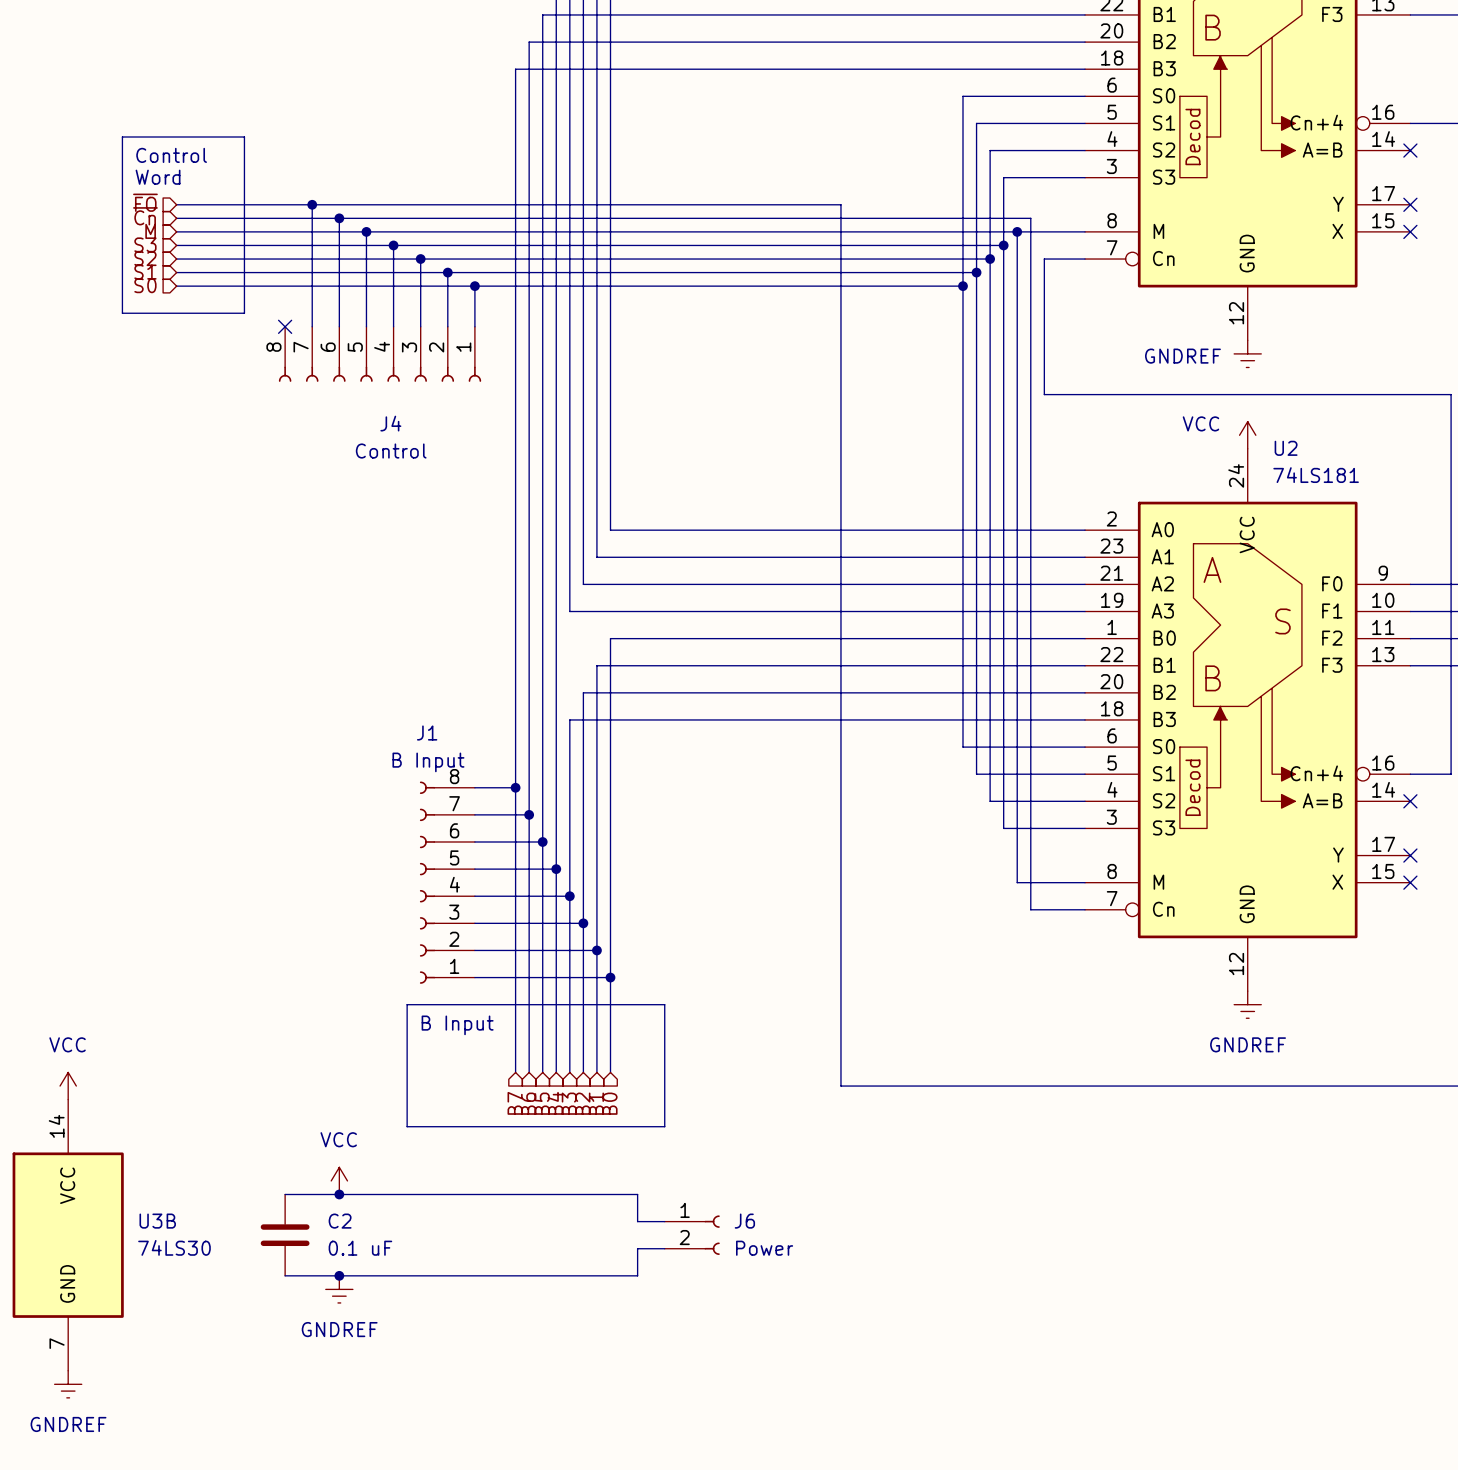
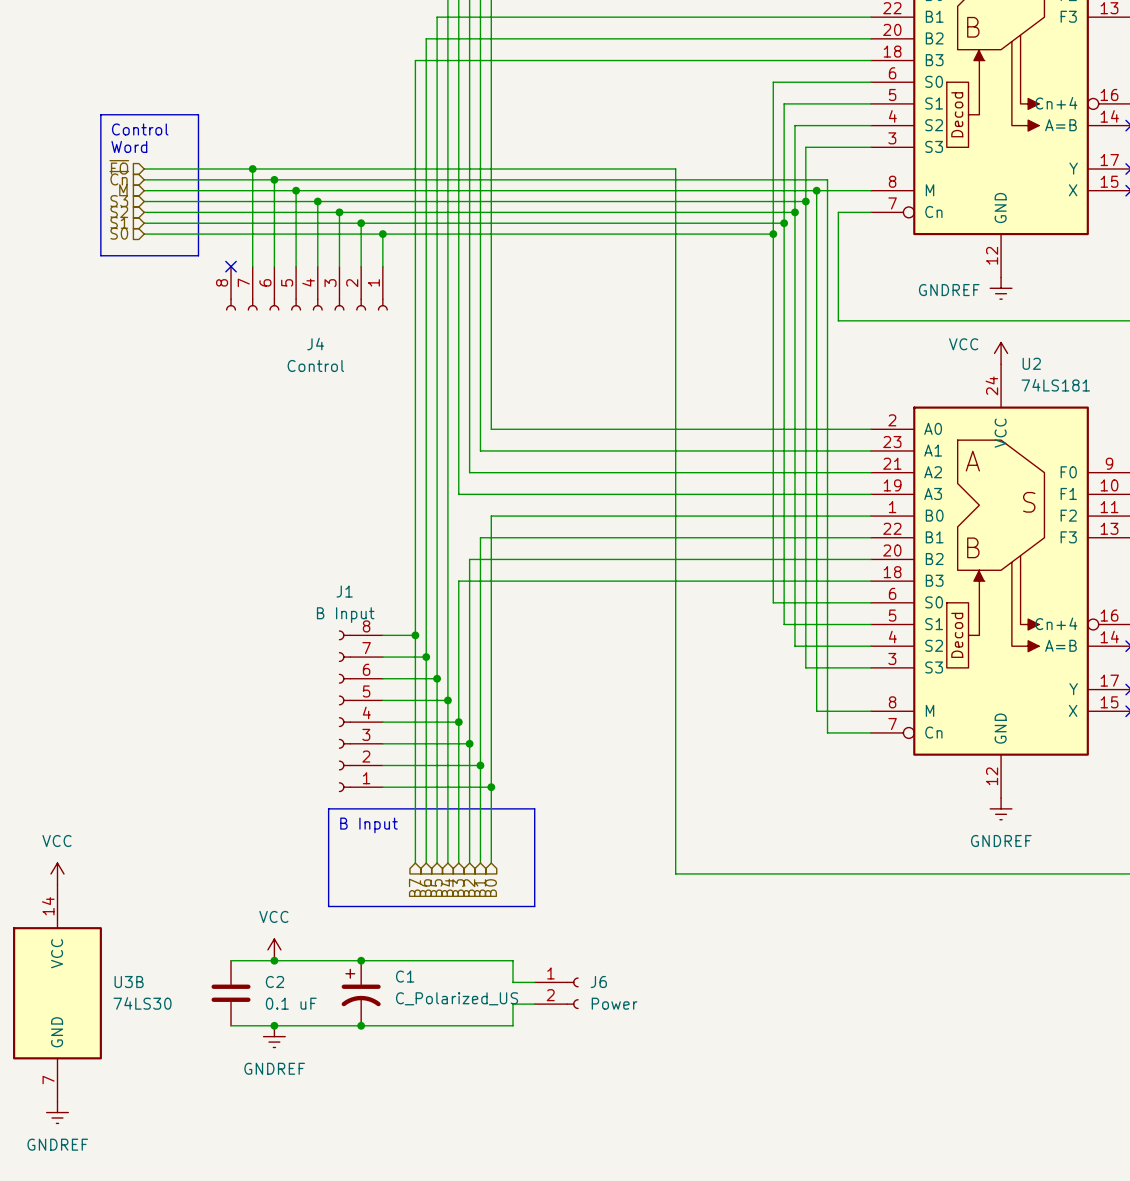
junction: none -> (361, 960)
C1: none -> C_Polarized_US (361, 993)
junction: none -> (361, 1025)

